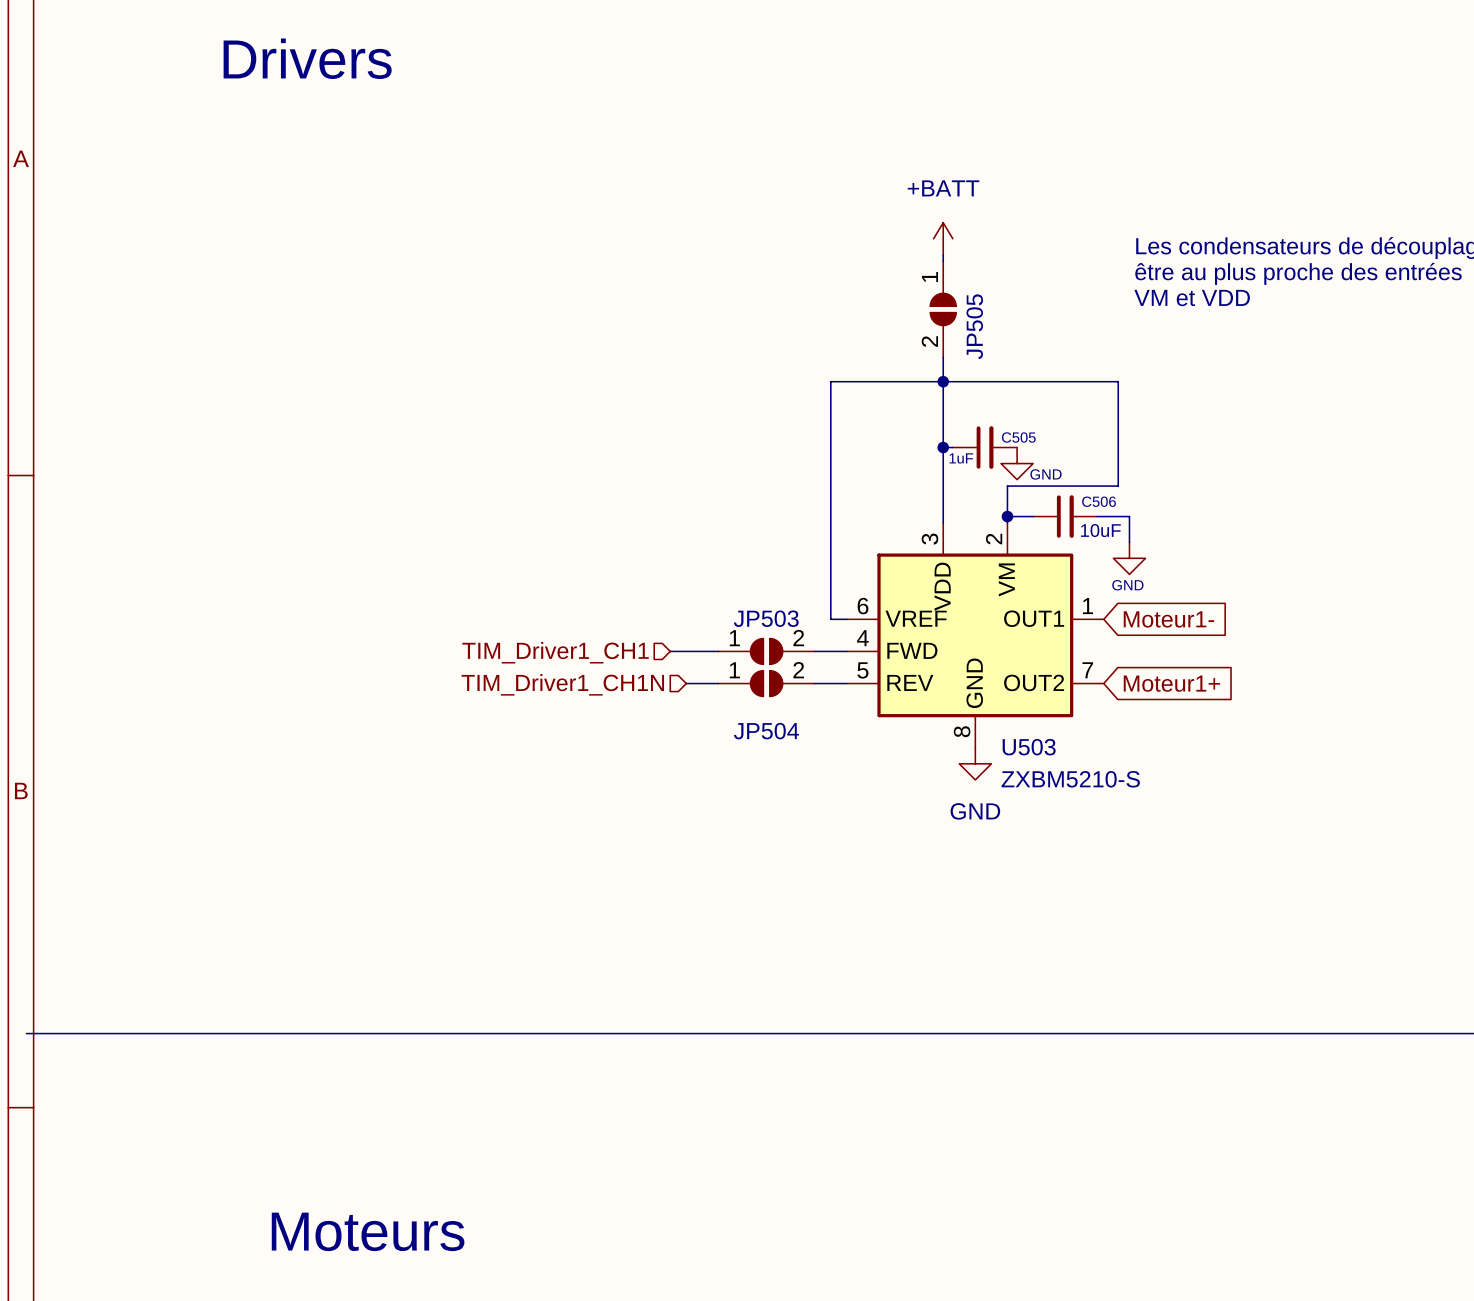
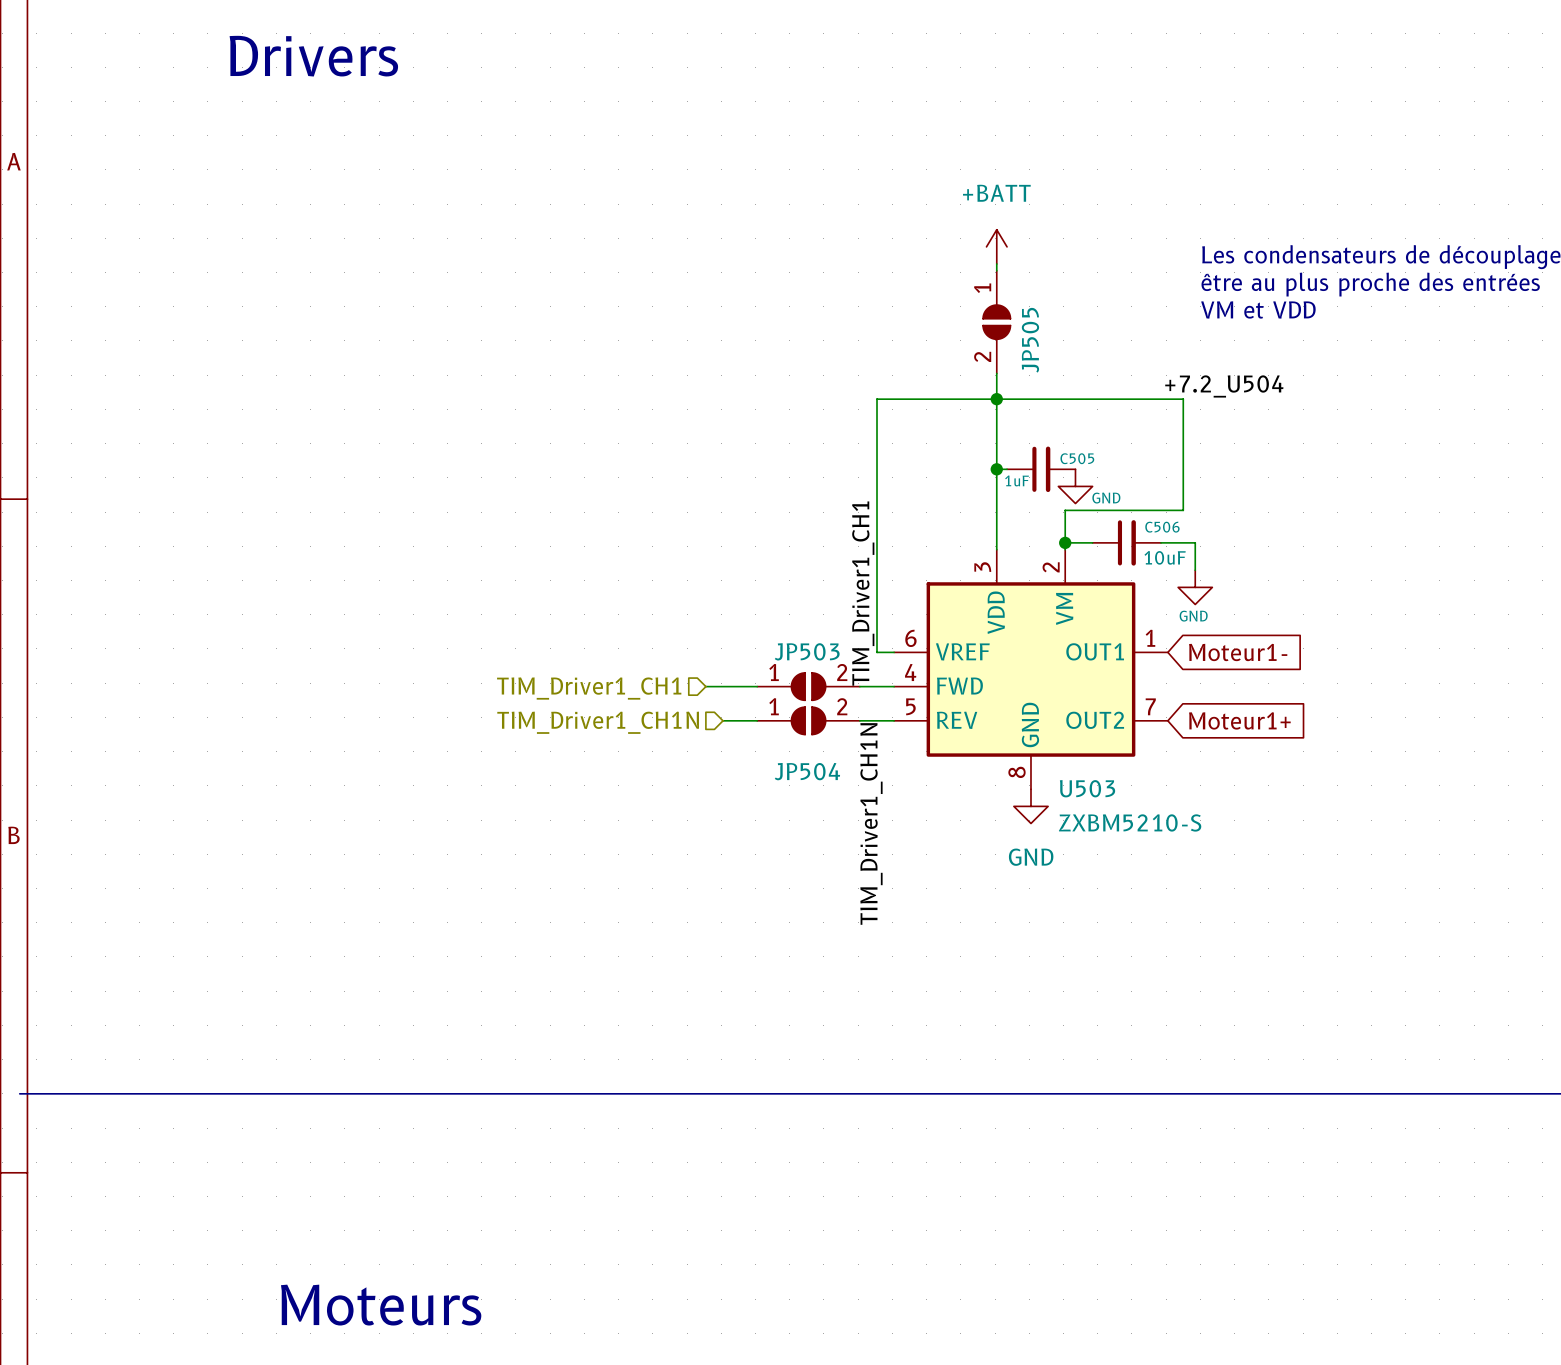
label: none -> +7.2_U504 (1224, 386)
label: none -> TIM_Driver1_CH1 (863, 593)
label: none -> TIM_Driver1_CH1N (871, 823)

